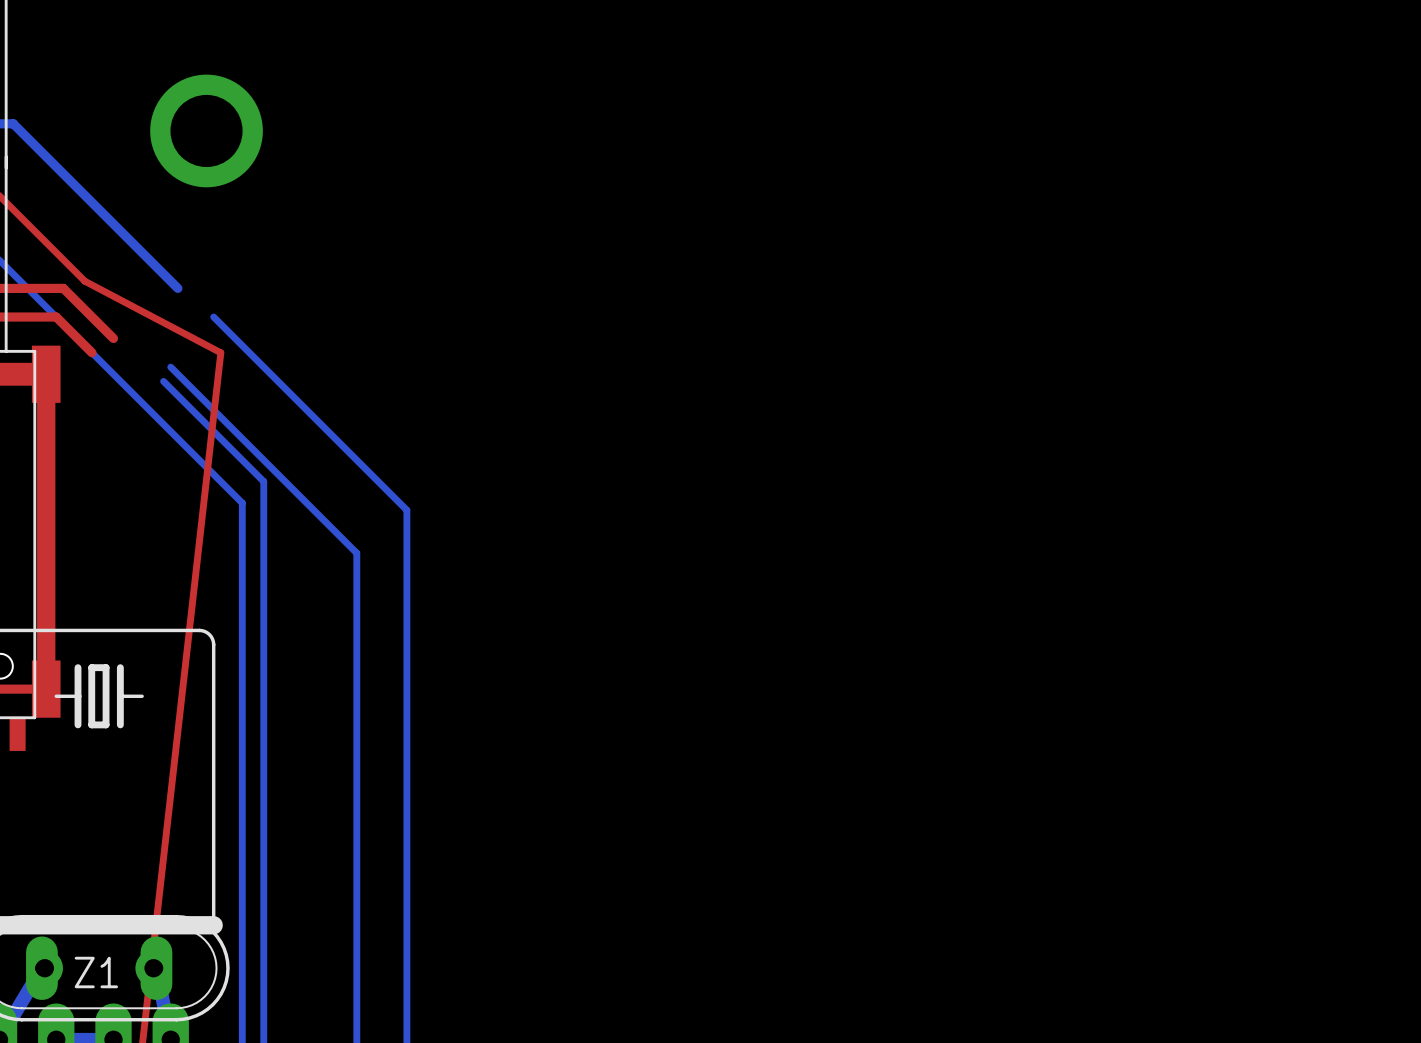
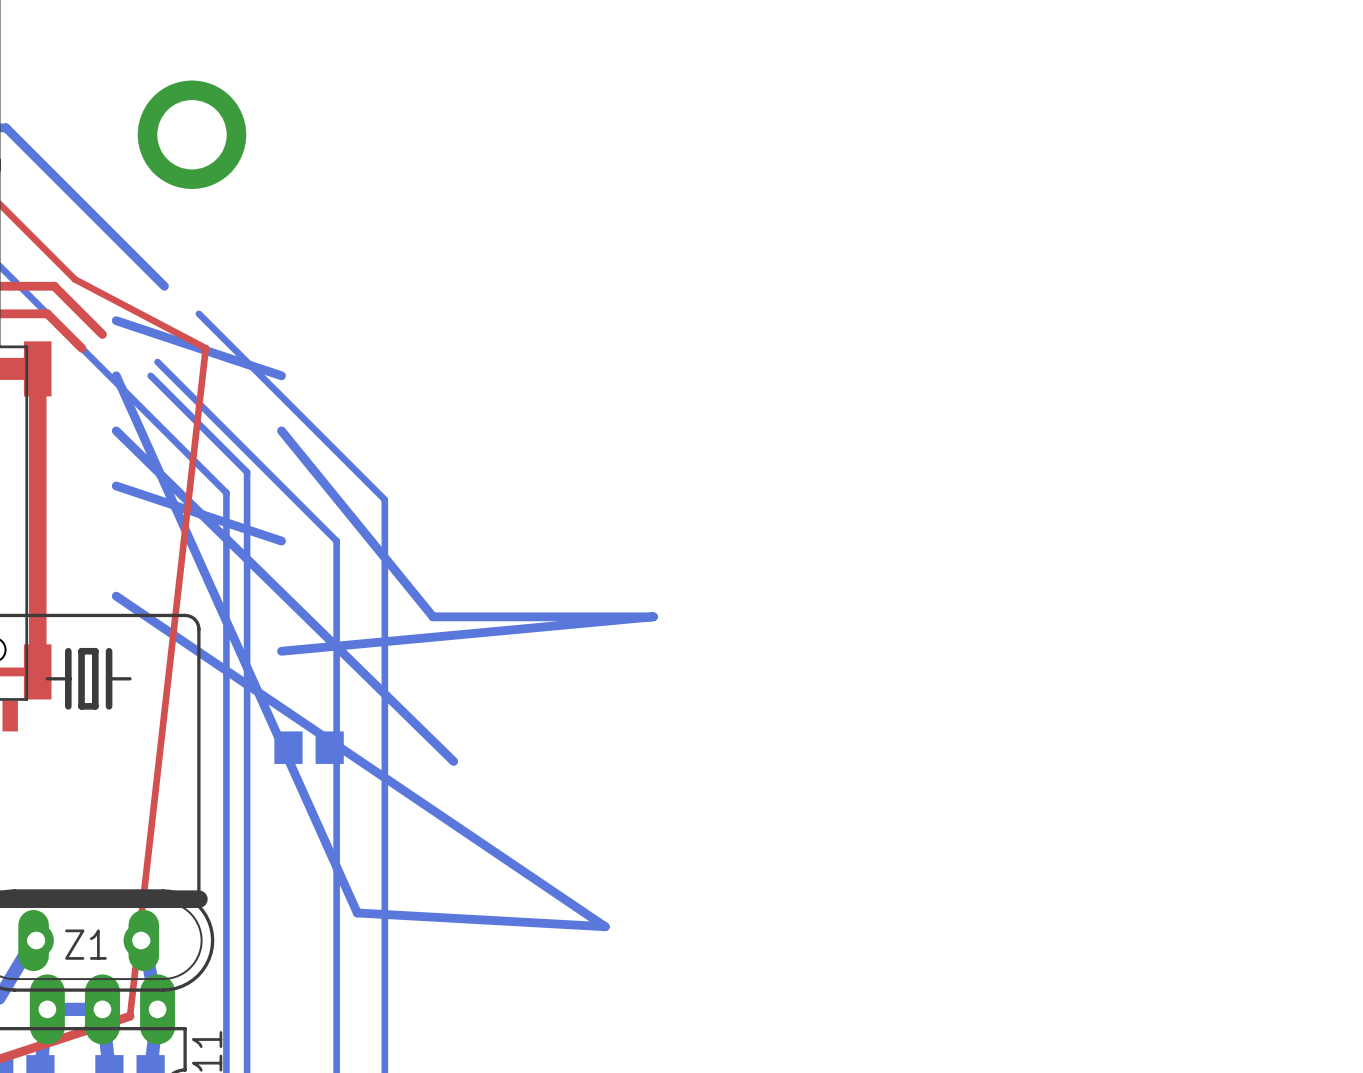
bottom track: none -> (116, 320) (281, 375)
bottom track: none -> (116, 375) (357, 912) (605, 926) (116, 596)
bottom track: none -> (116, 430) (453, 761)
bottom track: none -> (281, 430) (433, 616) (653, 616) (281, 651)
bottom track: none -> (116, 485) (281, 541)
part: none -> (309, 747)

